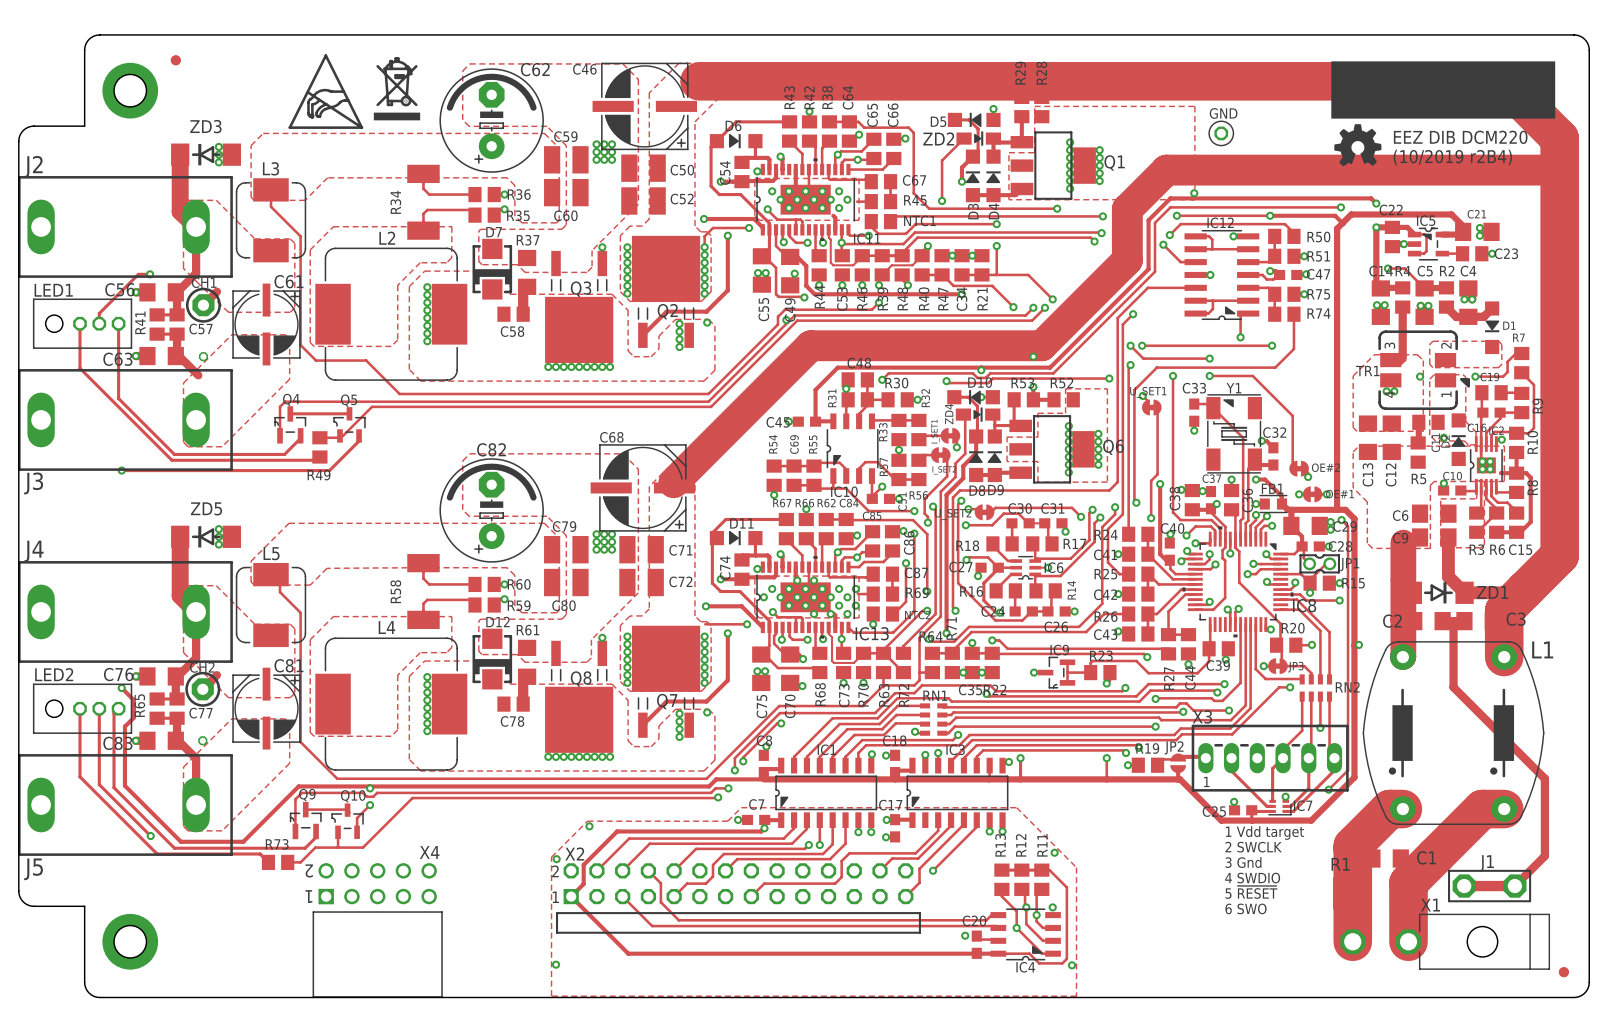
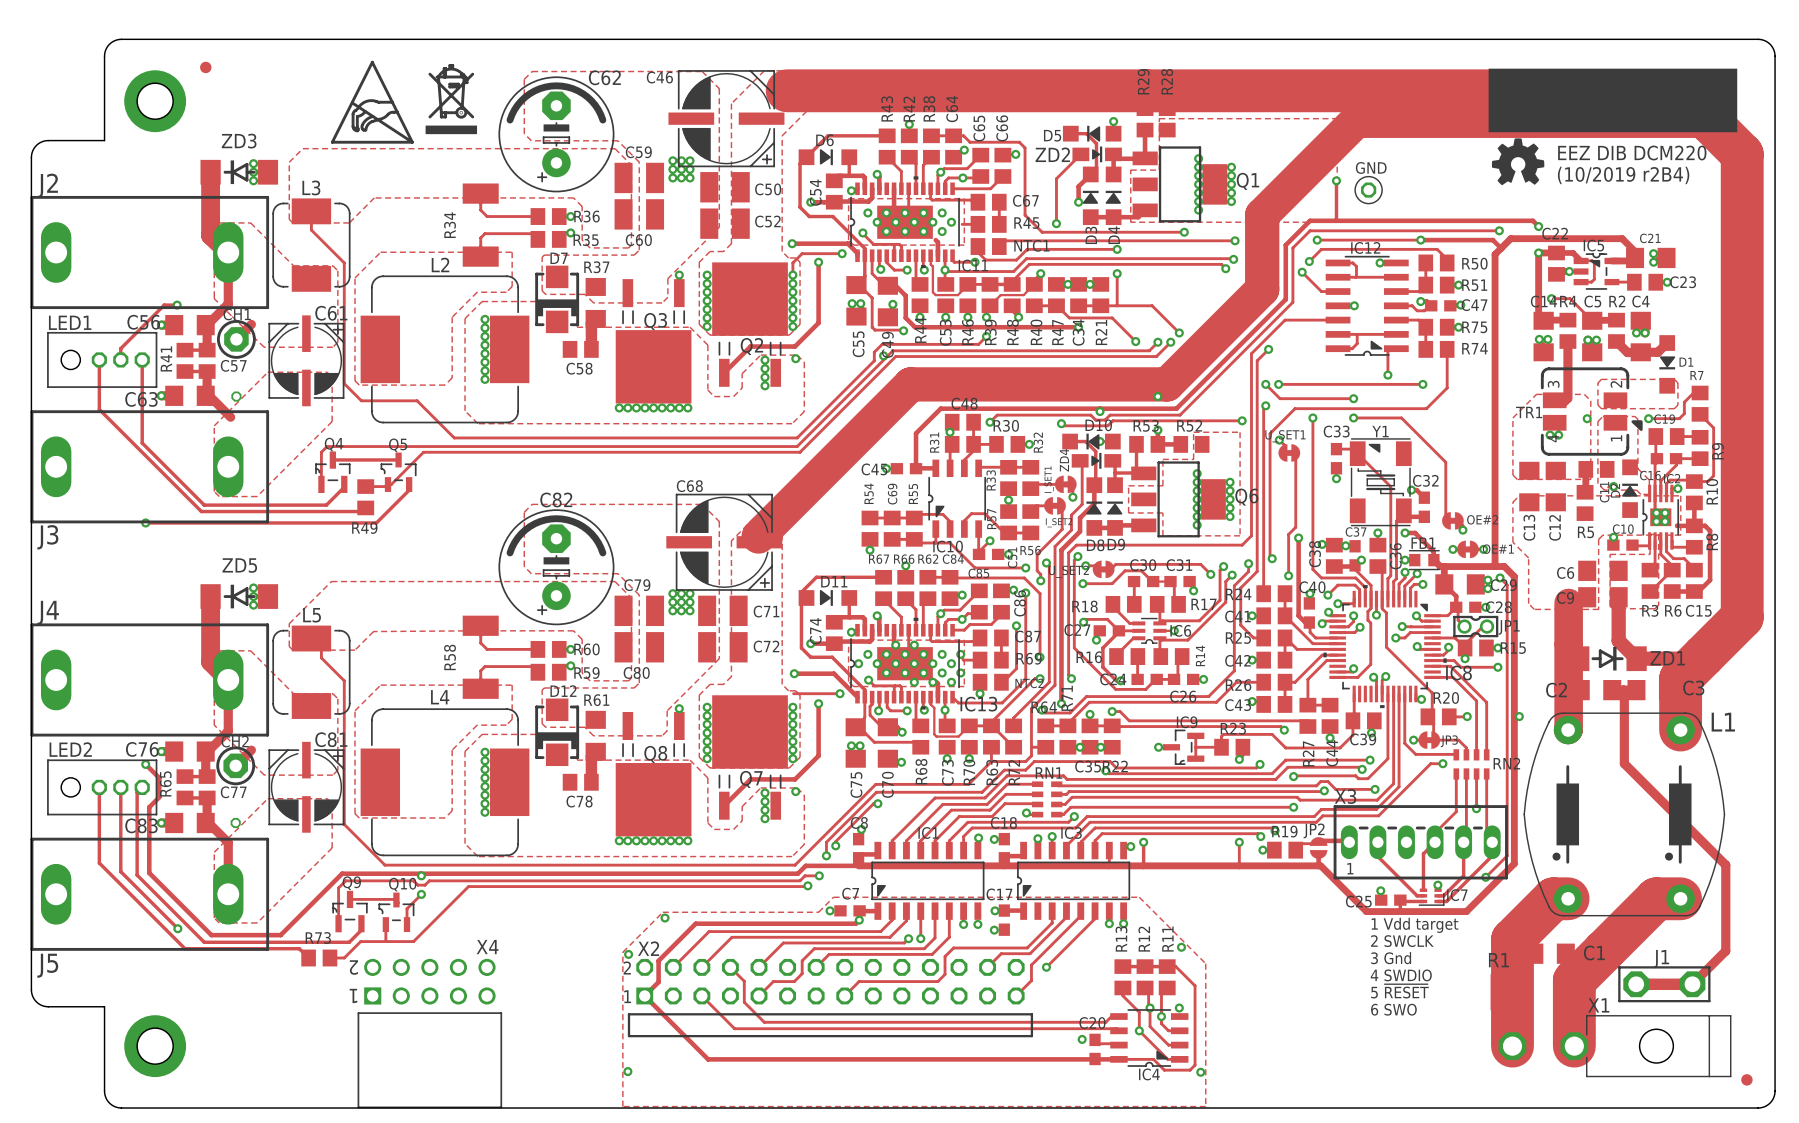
GND position: (1221, 133) -> (1368, 190)
track: none -> (1336, 180) (1336, 215)
track: (1559, 168) (1166, 170) (1127, 209) -> (1708, 120) (1356, 120) (1262, 215) (1262, 232)
via position: (1194, 193) -> (1336, 180)

